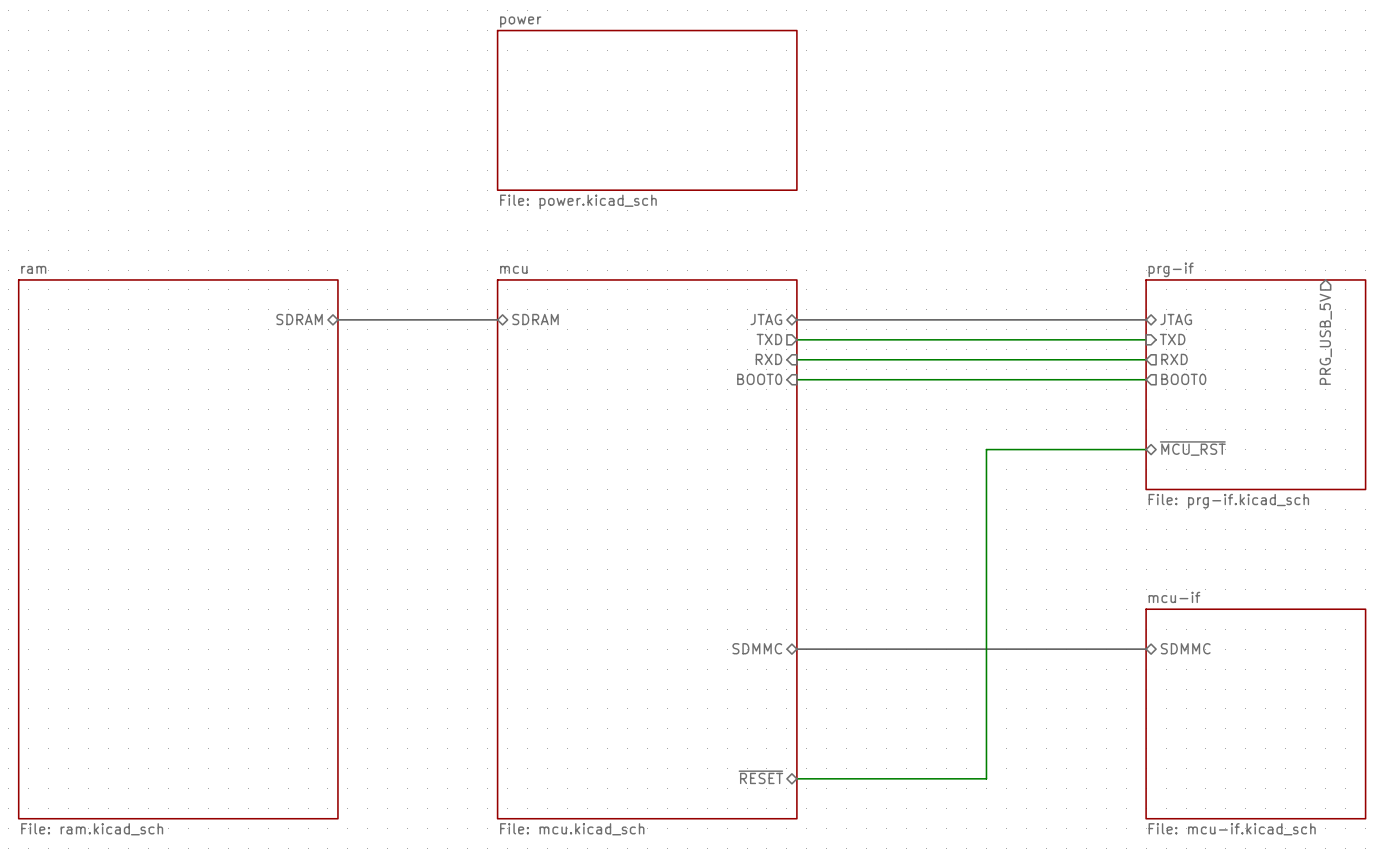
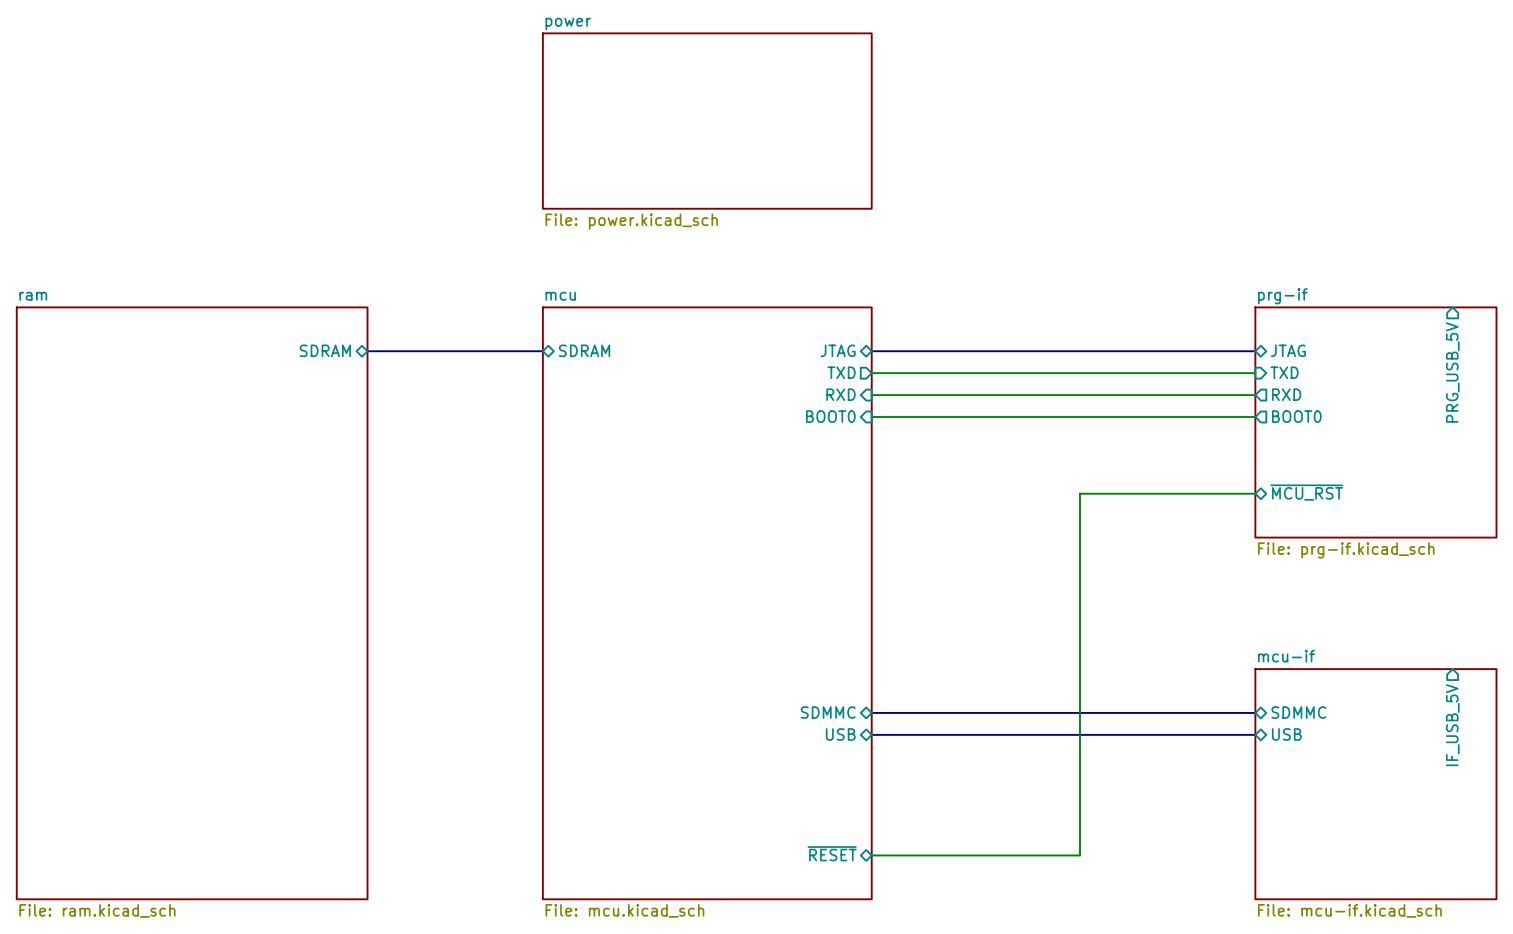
sheet pin: none -> IF_USB_5V (1452, 725)
sheet pin: none -> USB (840, 734)
sheet pin: none -> USB (1286, 734)
bus: none -> (871, 734) (1255, 734)

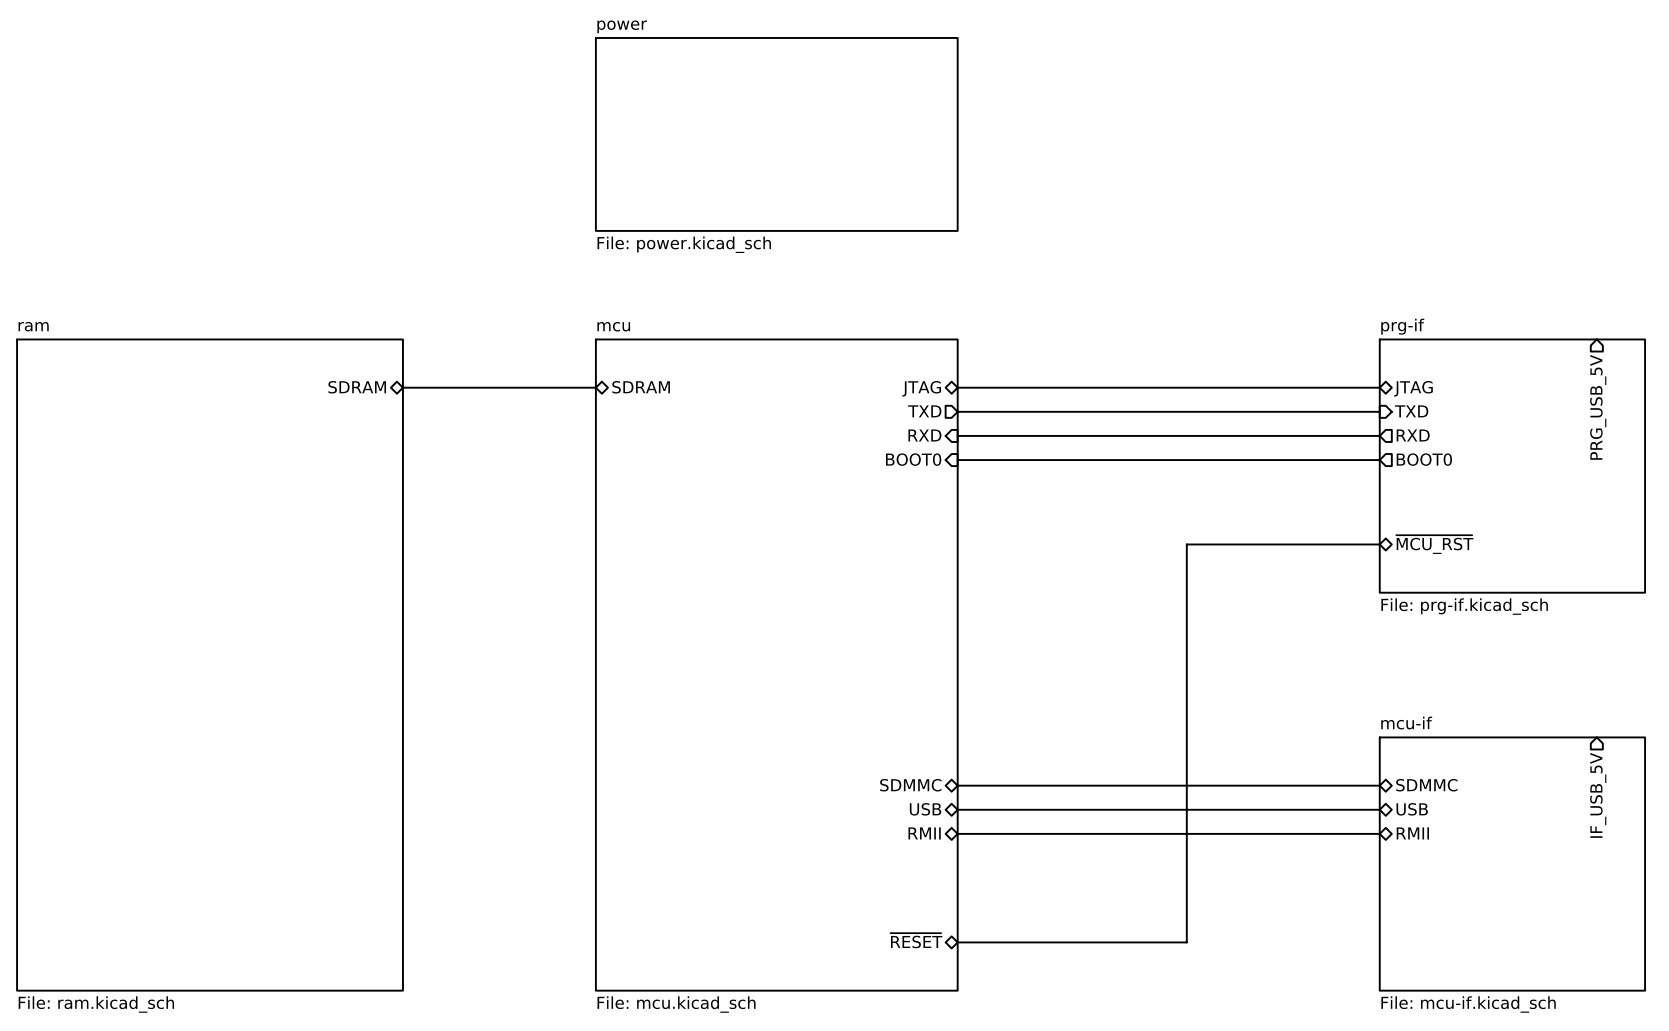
sheet pin: none -> RMII (924, 833)
bus: none -> (957, 833) (1379, 833)
sheet pin: none -> RMII (1412, 833)

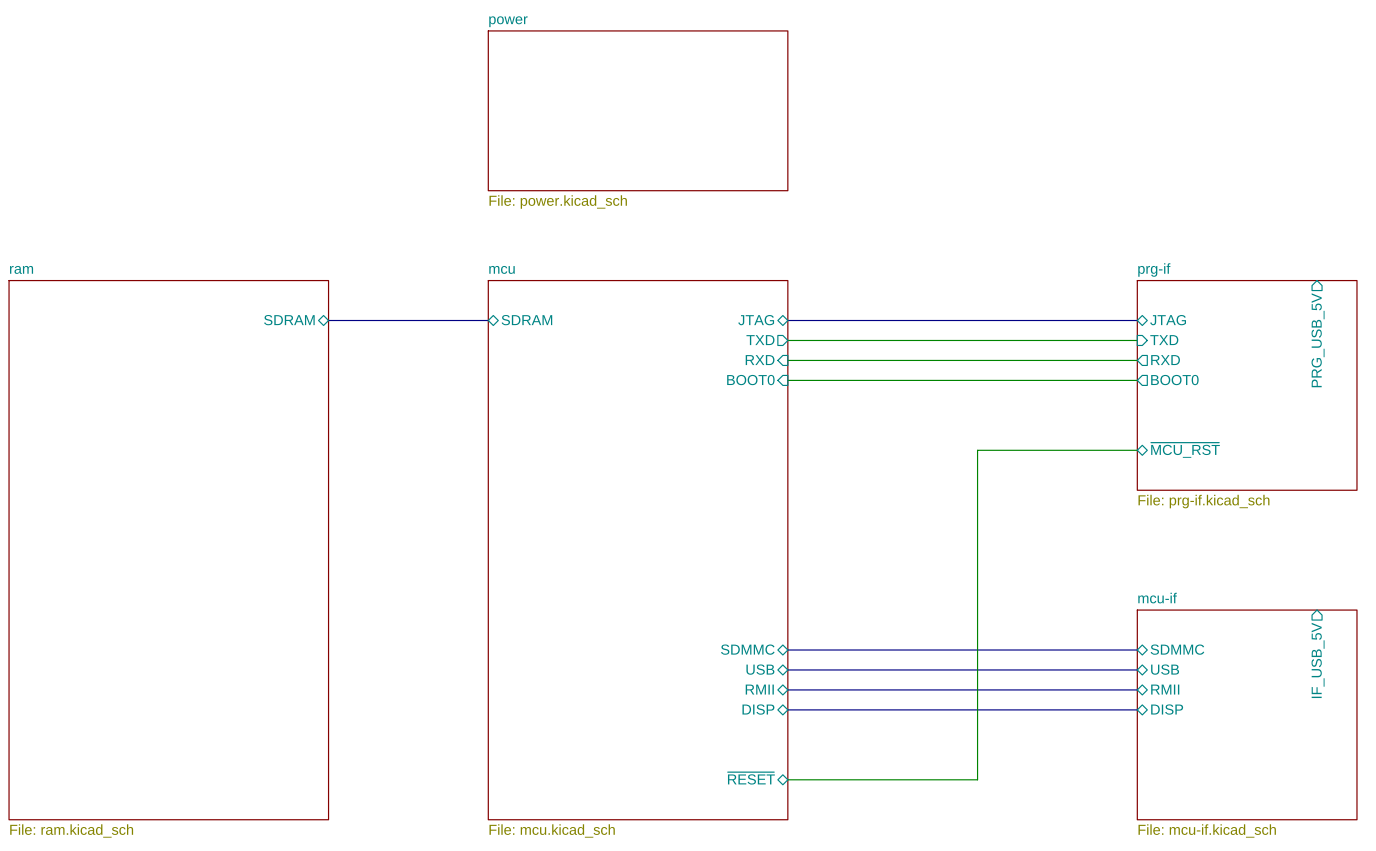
sheet pin: none -> DISP (758, 709)
sheet pin: none -> DISP (1167, 709)
bus: none -> (787, 709) (1137, 709)

